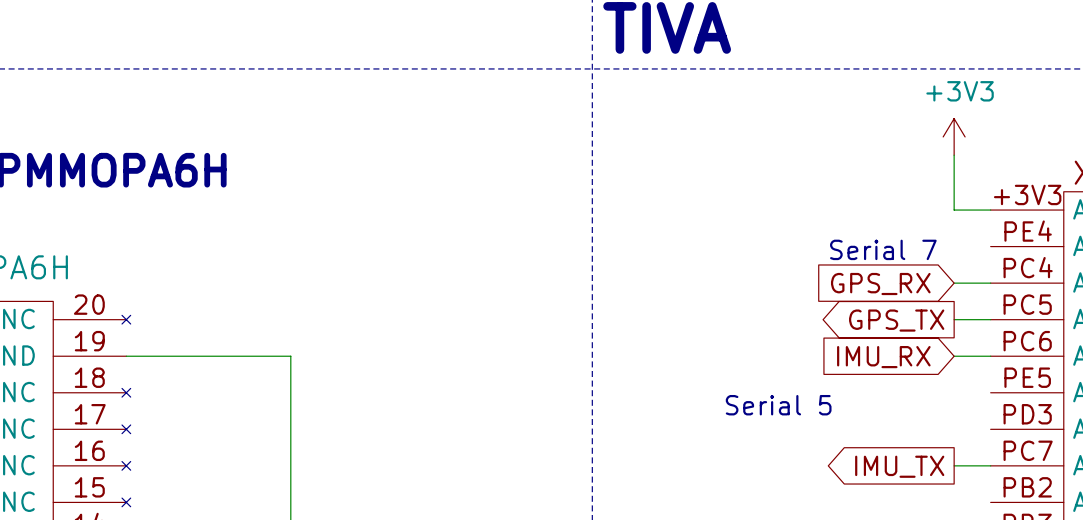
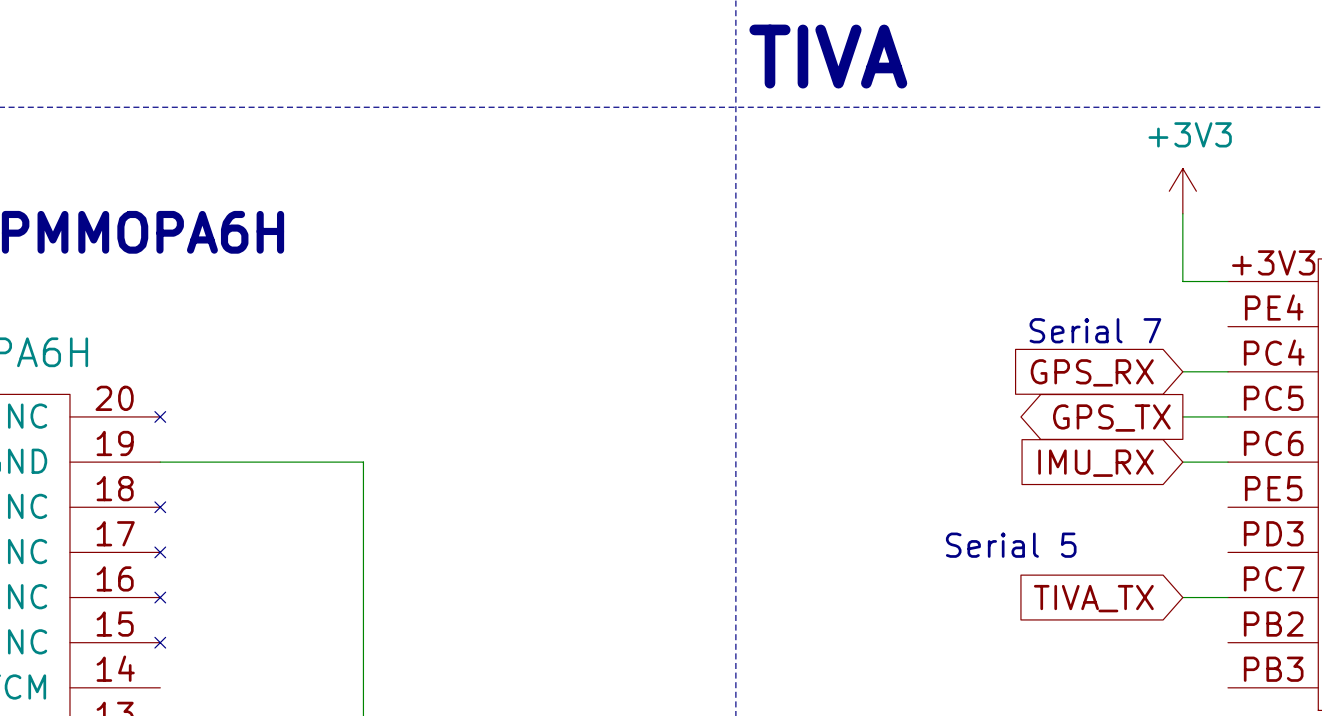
text position: Serial 5 (778, 405) -> Serial 5 (1011, 545)
global label shape: output (899, 466) -> input (1093, 598)
global label: IMU_TX (899, 466) -> TIVA_TX (1093, 598)

